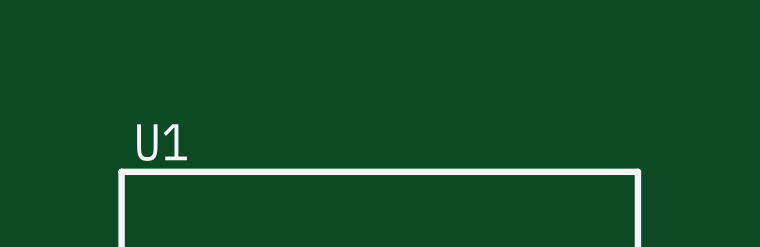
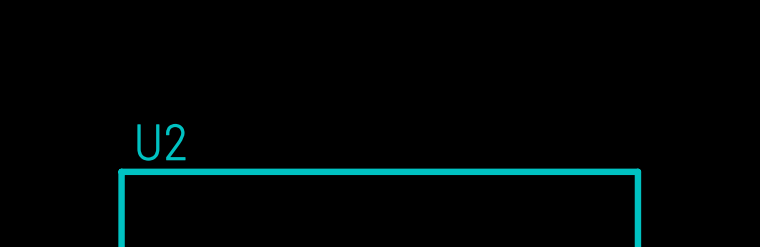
U1 name: U1 (162, 142) -> U2 (161, 142)

